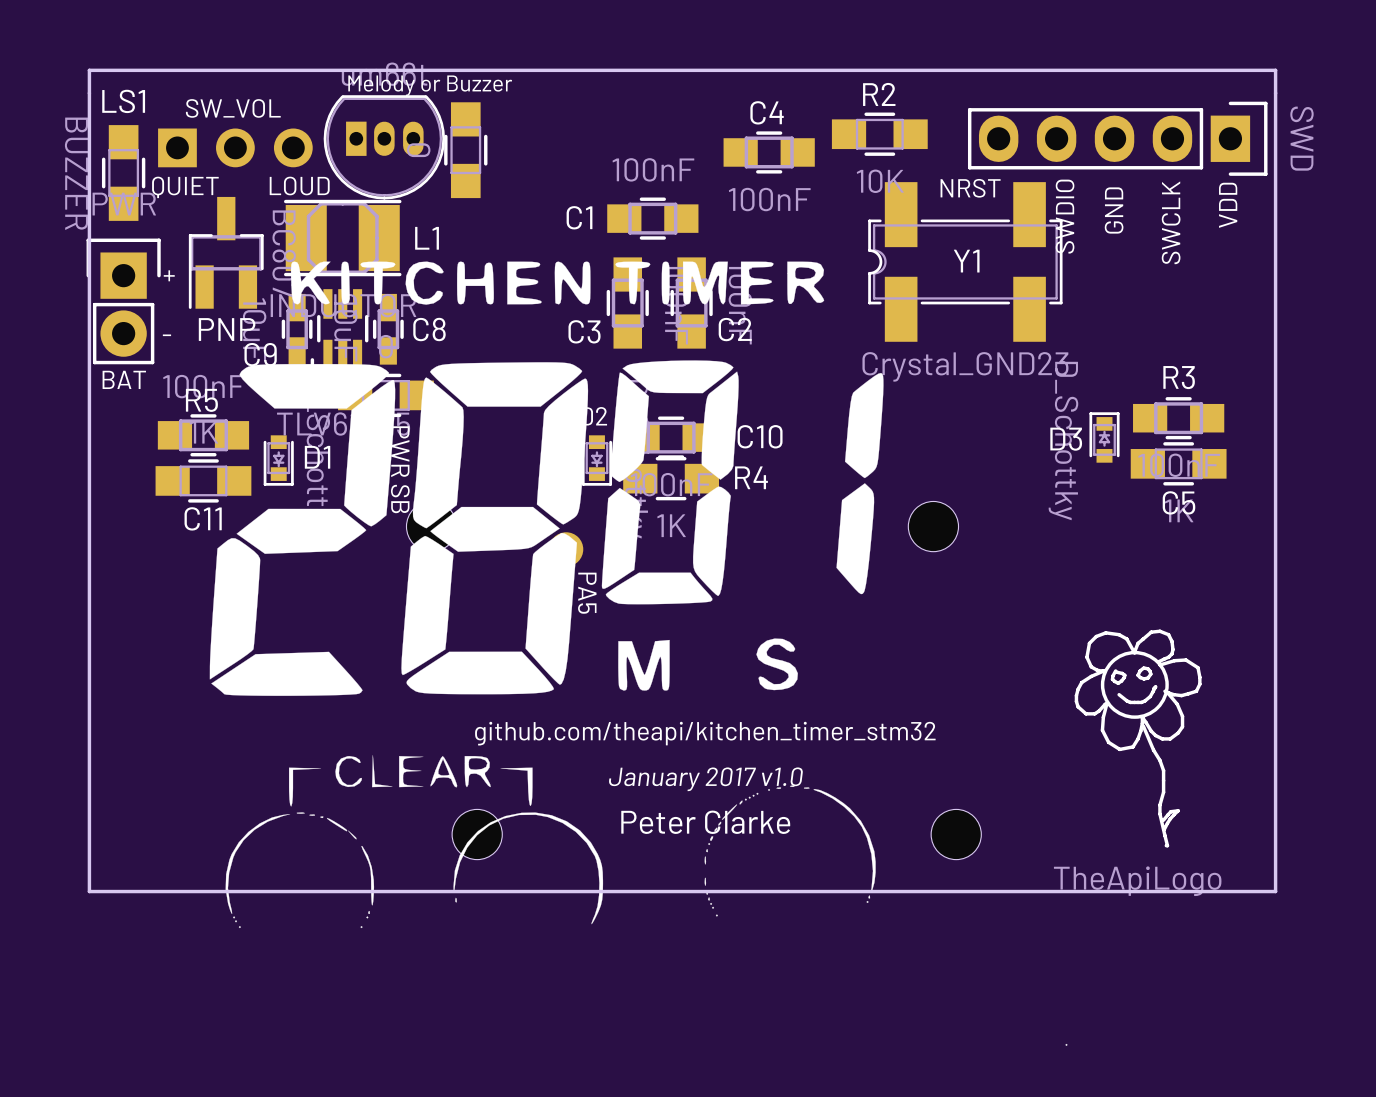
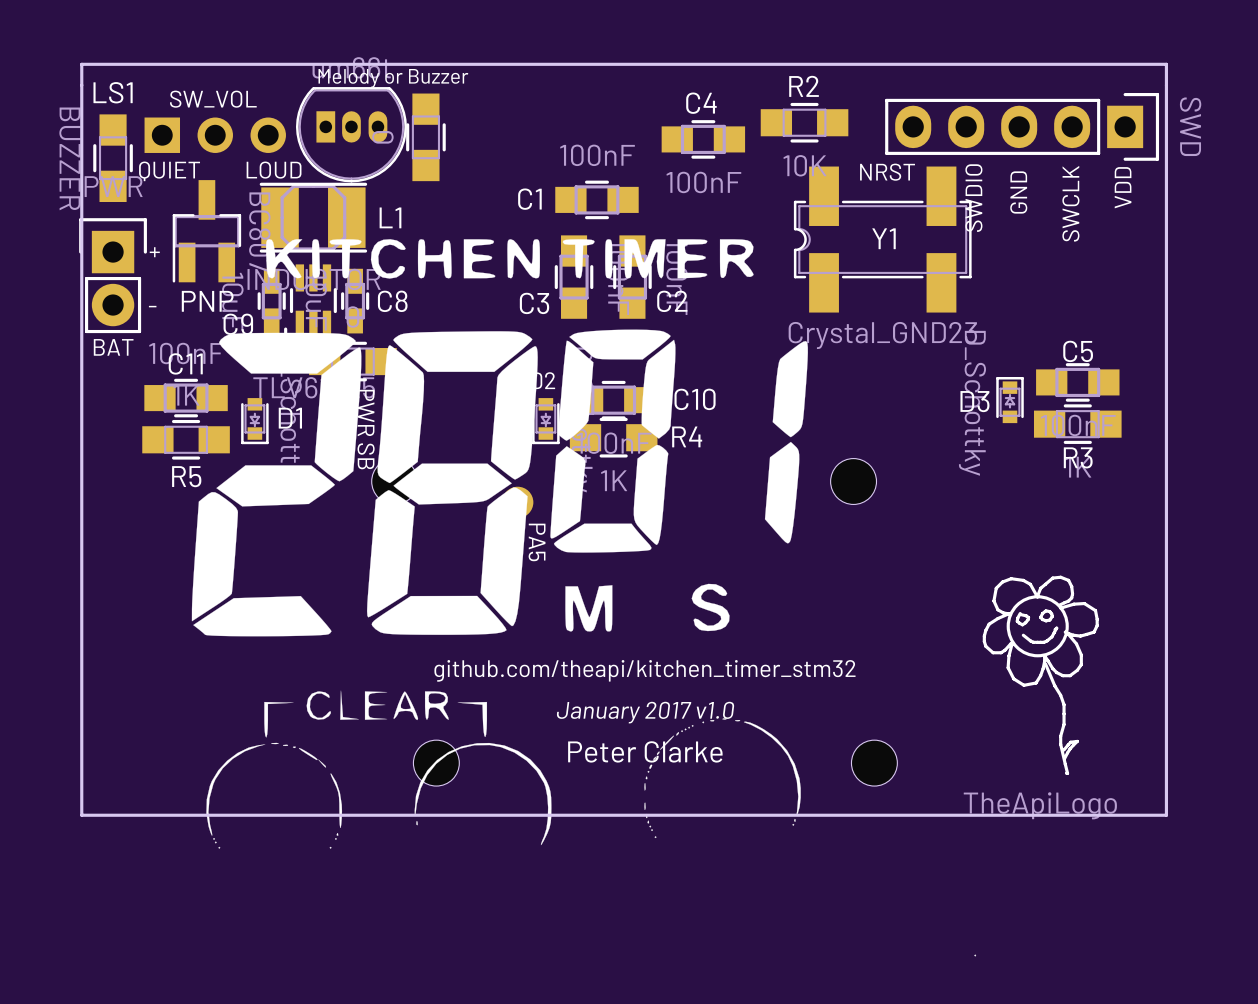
R3 name position: R3 (1179, 377) -> R3 (1078, 457)
R5 name position: R5 (201, 400) -> R5 (186, 476)
C5 name position: C5 (1179, 502) -> C5 (1078, 351)
C11 name position: C11 (203, 518) -> C11 (185, 363)

